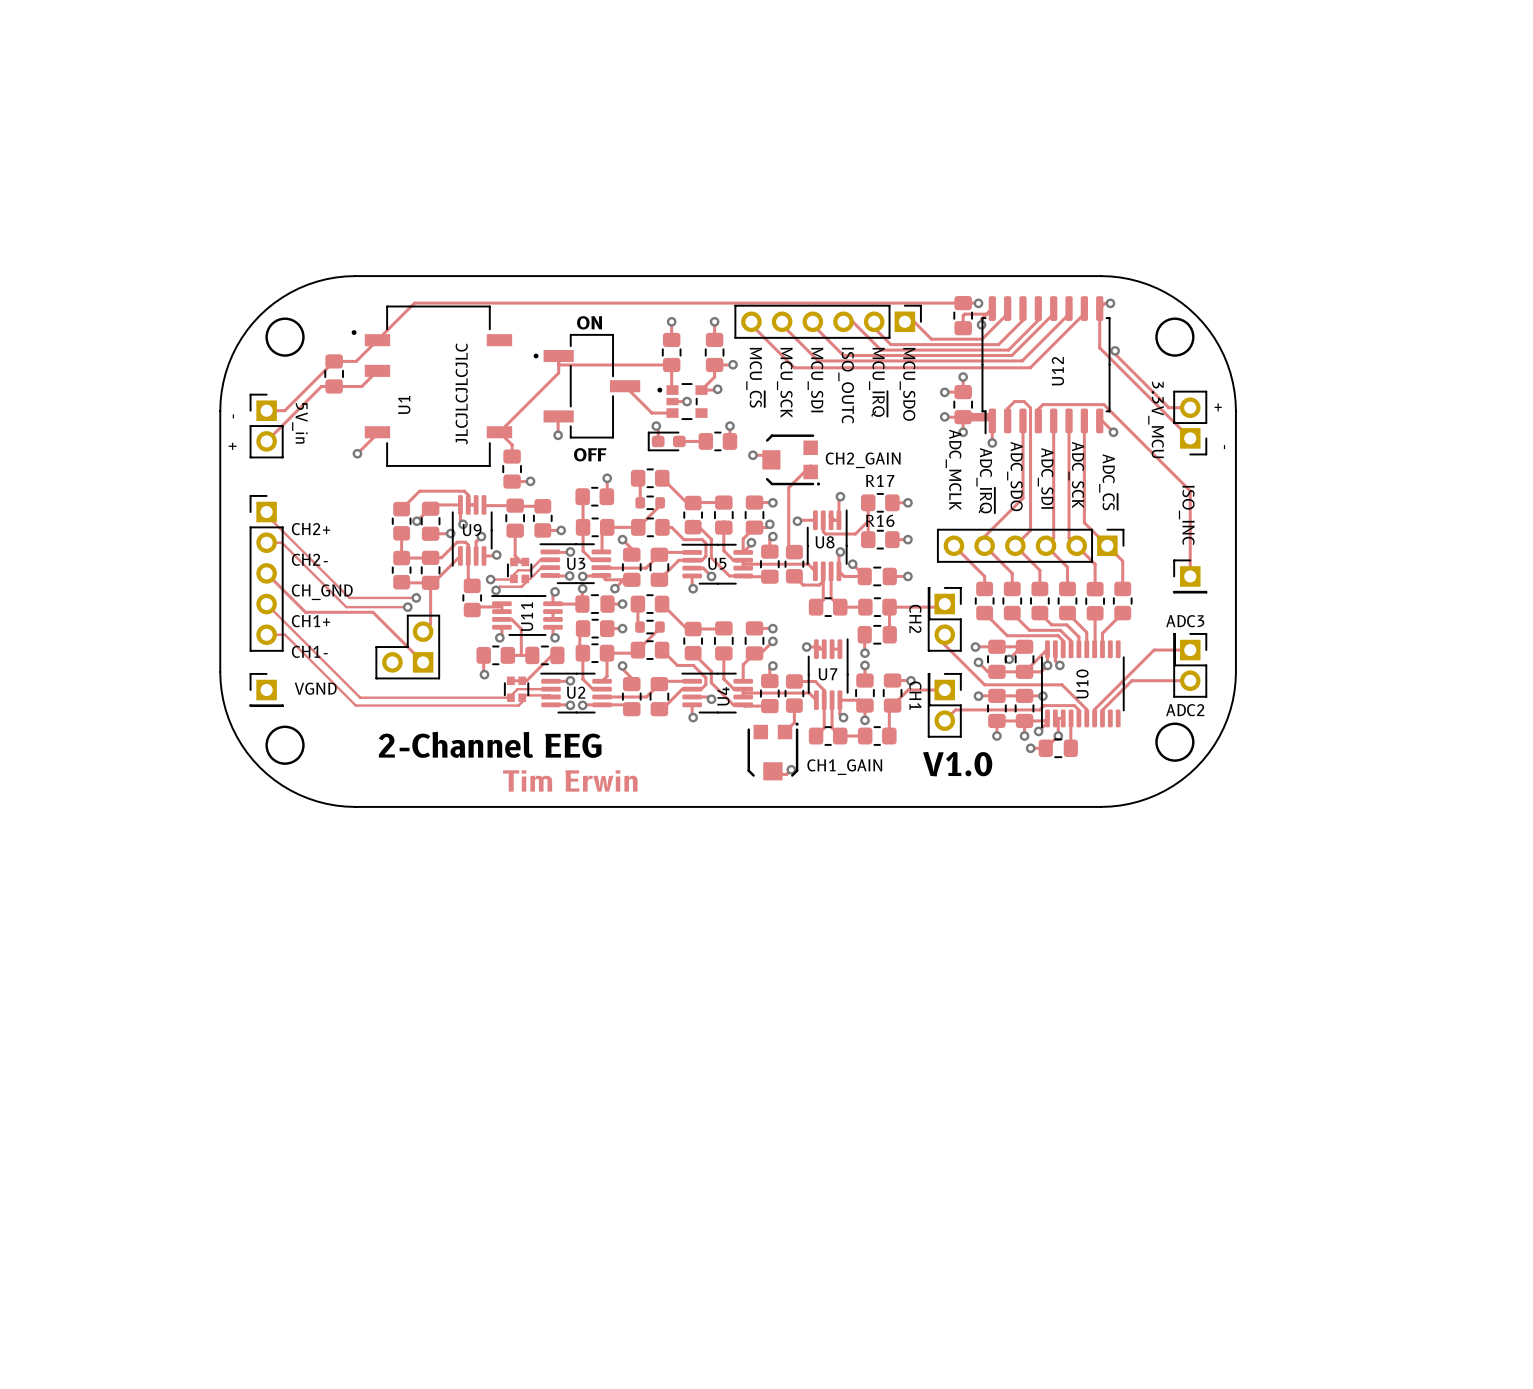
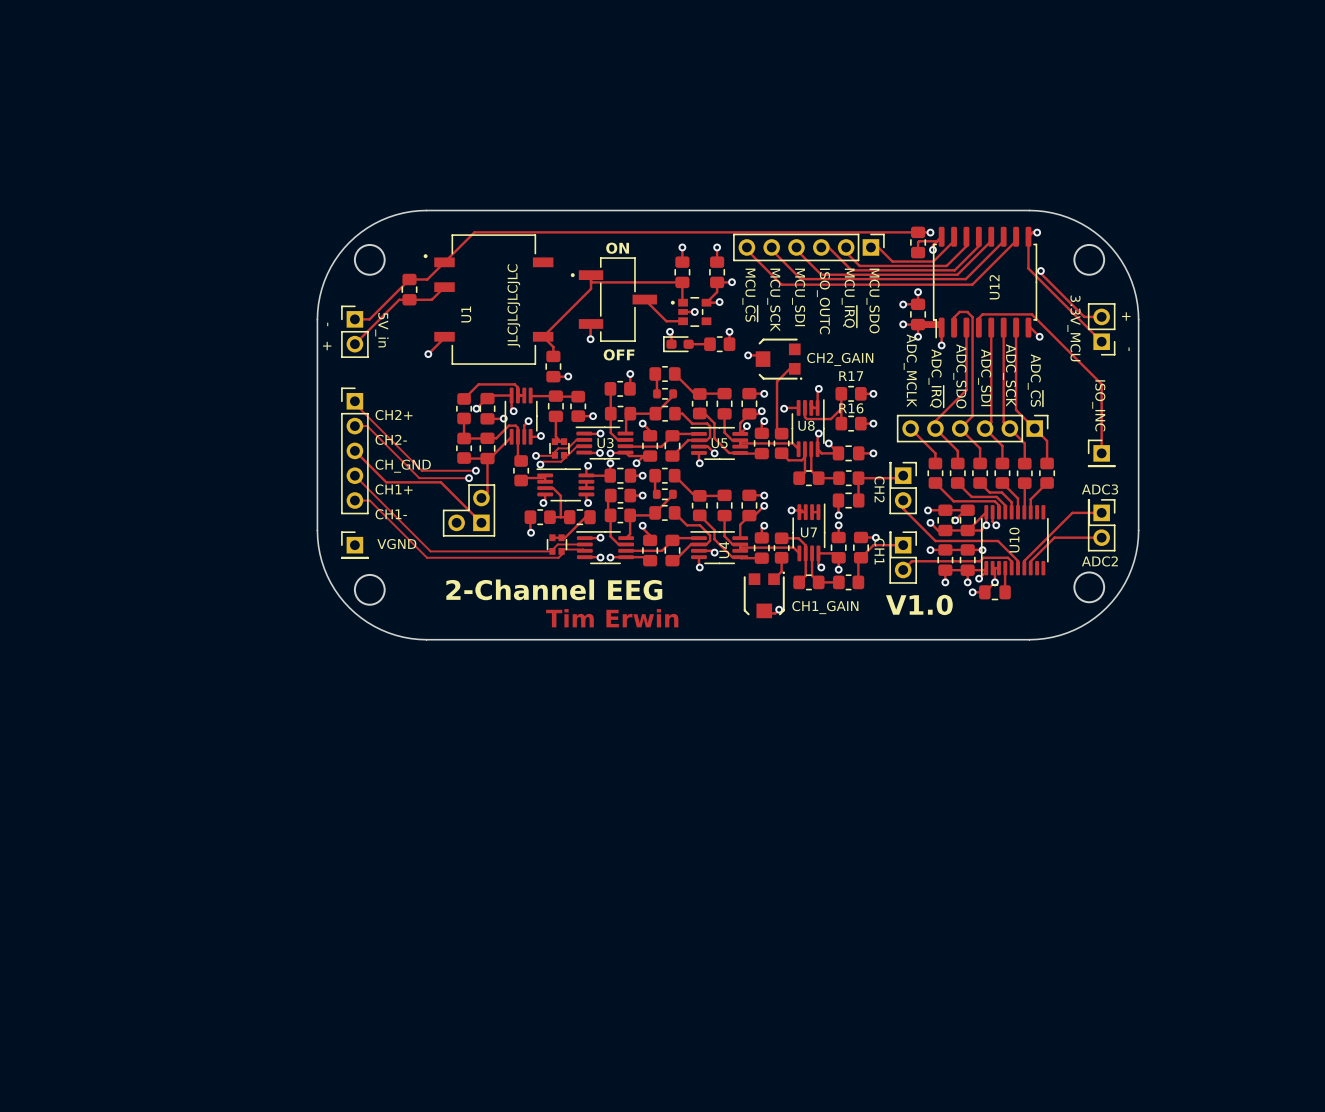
U9 name: U9 (472, 530) -> none
U11 name: U11 (527, 616) -> none
U2 name: U2 (576, 692) -> none

